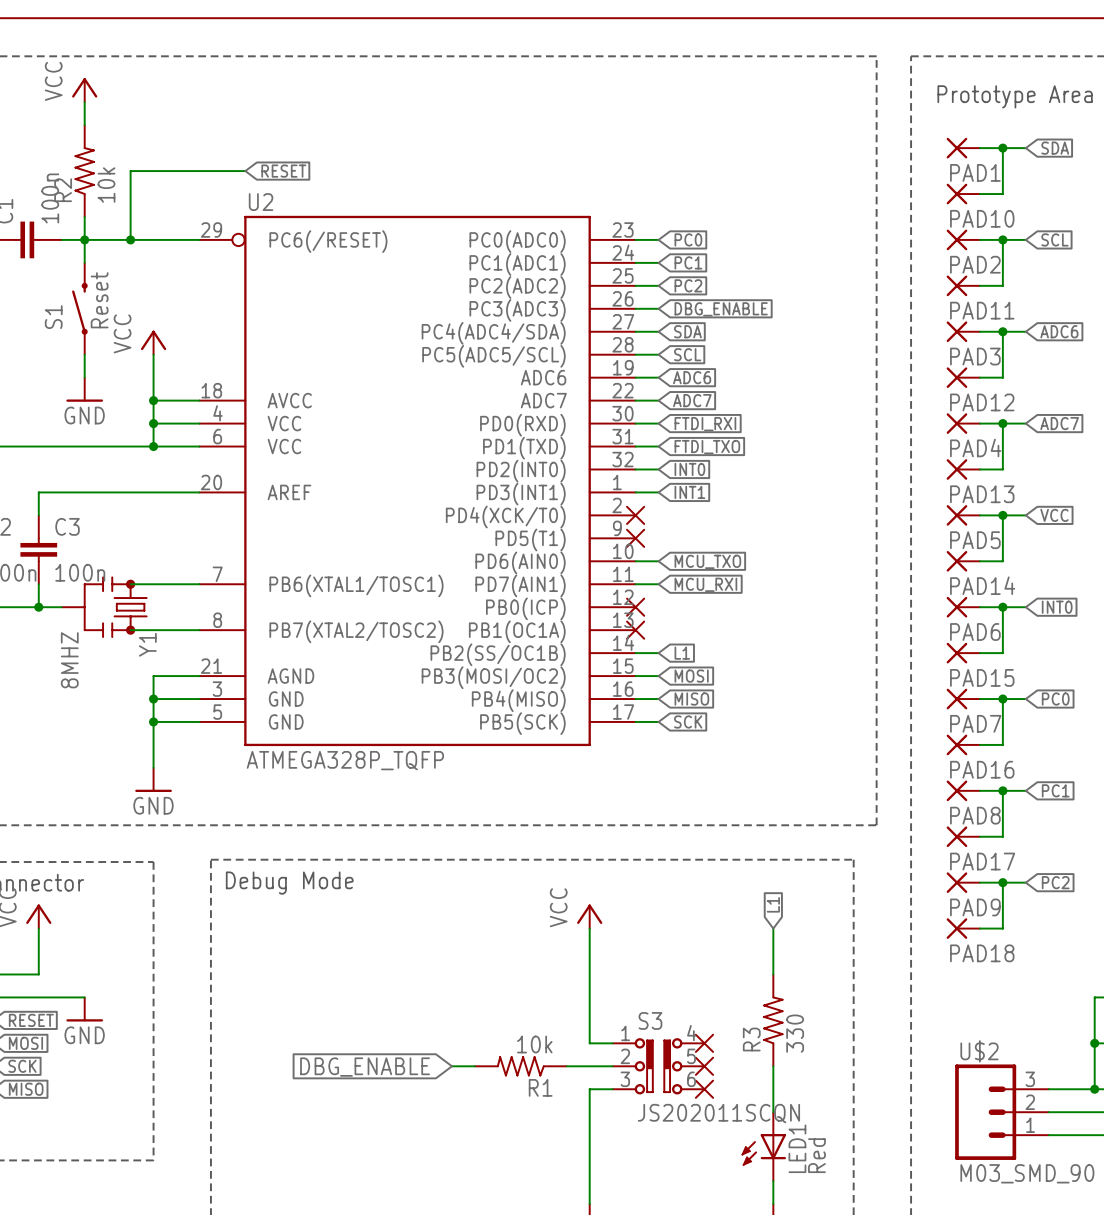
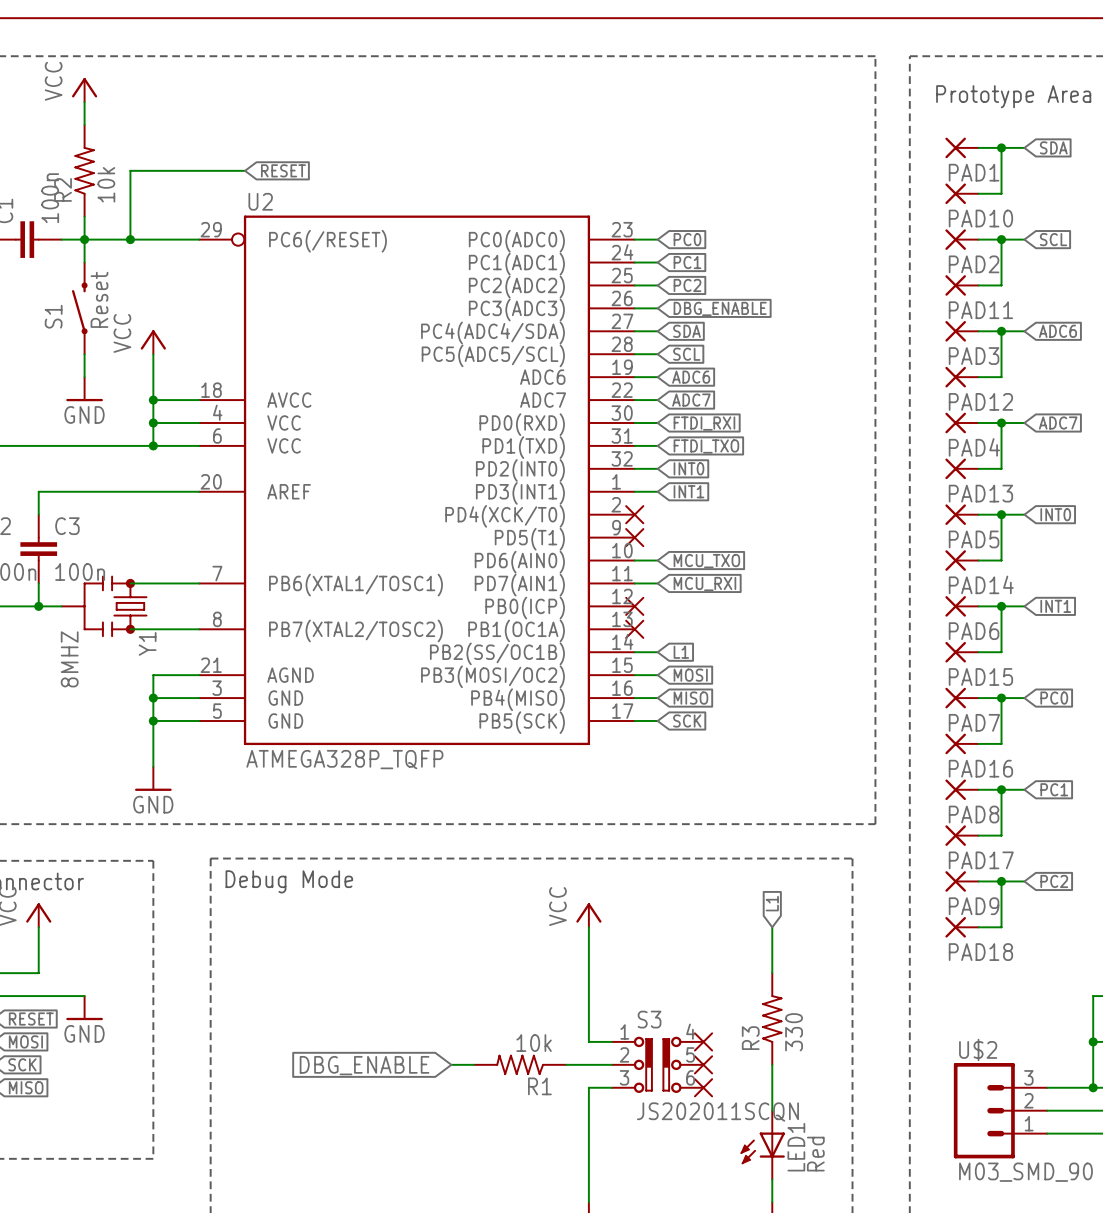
global label: VCC (1054, 515) -> INT0 (1055, 514)
global label: INT0 (1057, 607) -> INT1 (1055, 606)

